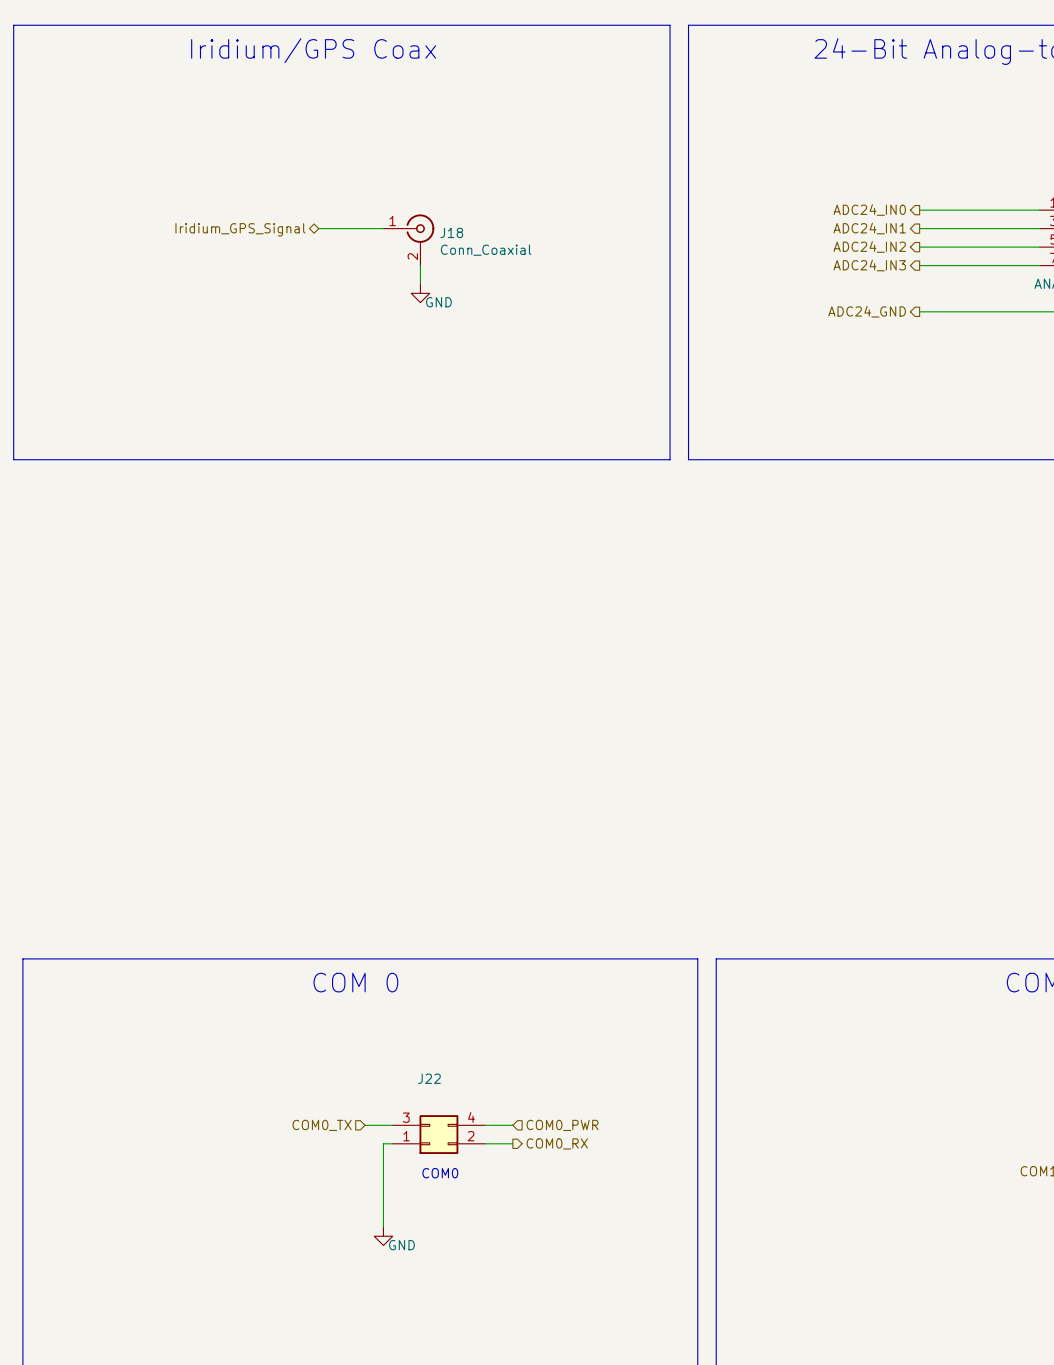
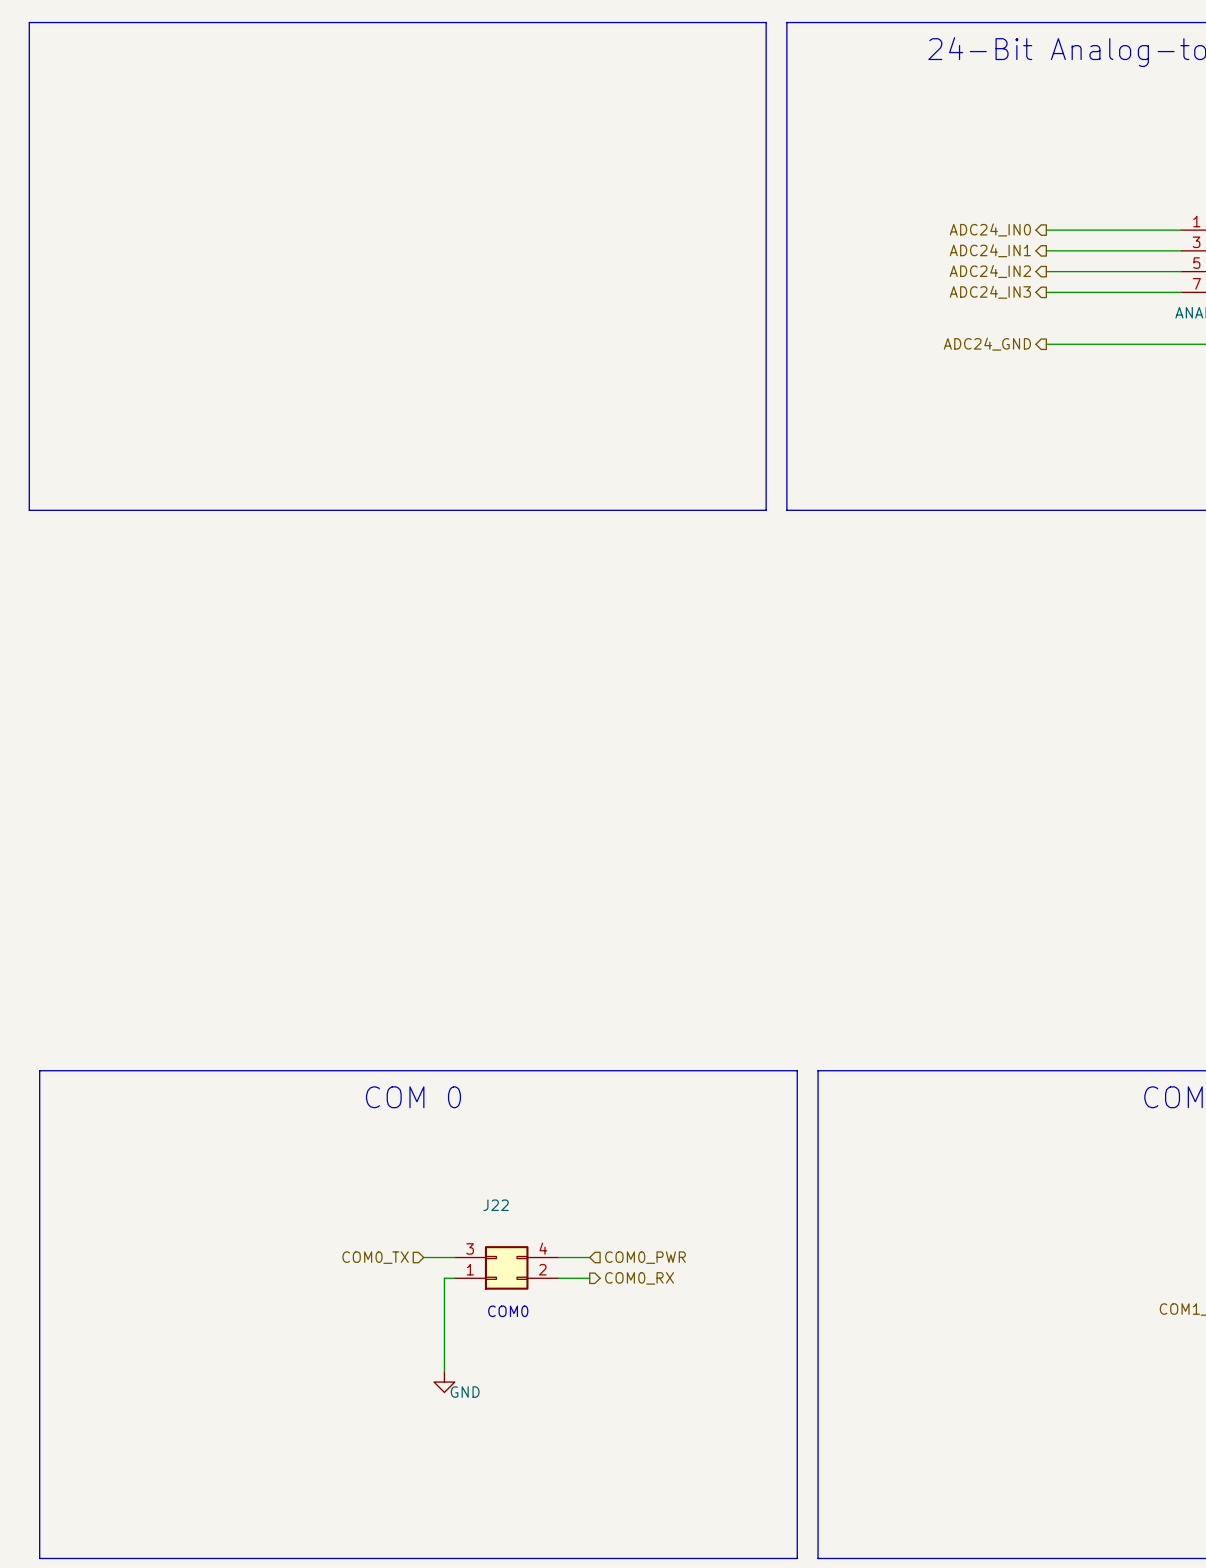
text: Iridium/GPS Coax (313, 50) -> none
wire: (318, 228) (383, 228) -> none
hierarchical label: Iridium_GPS_Signal (240, 229) -> none
J18: Conn_Coaxial (408, 240) -> none
wire: (420, 265) (420, 284) -> none
power symbol: GND (420, 293) -> none

